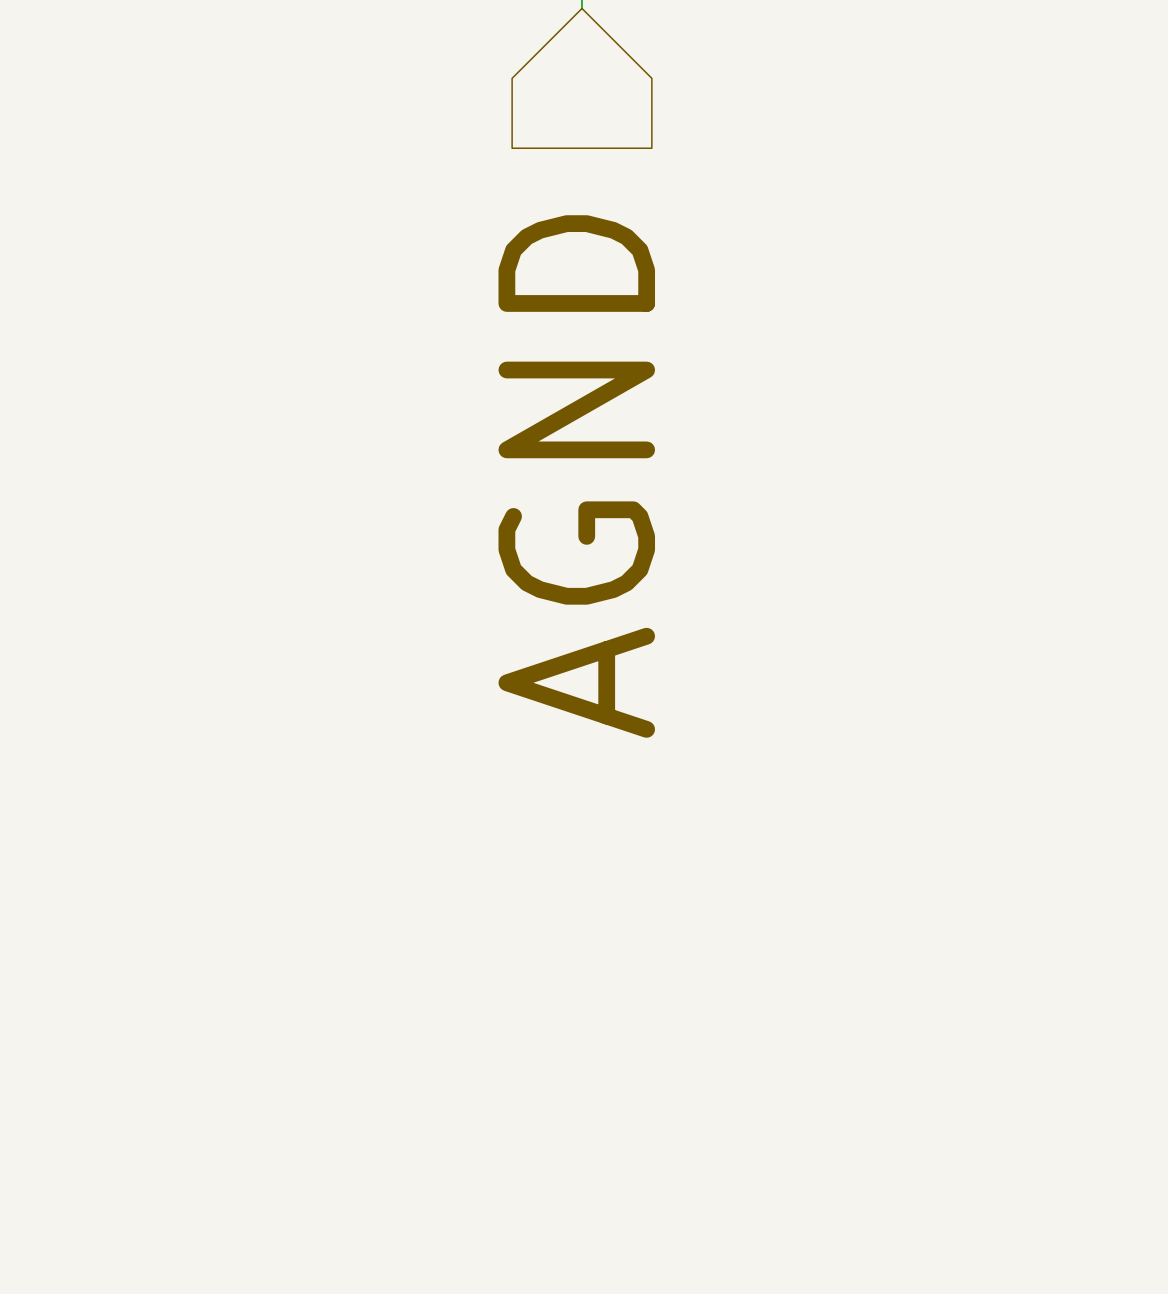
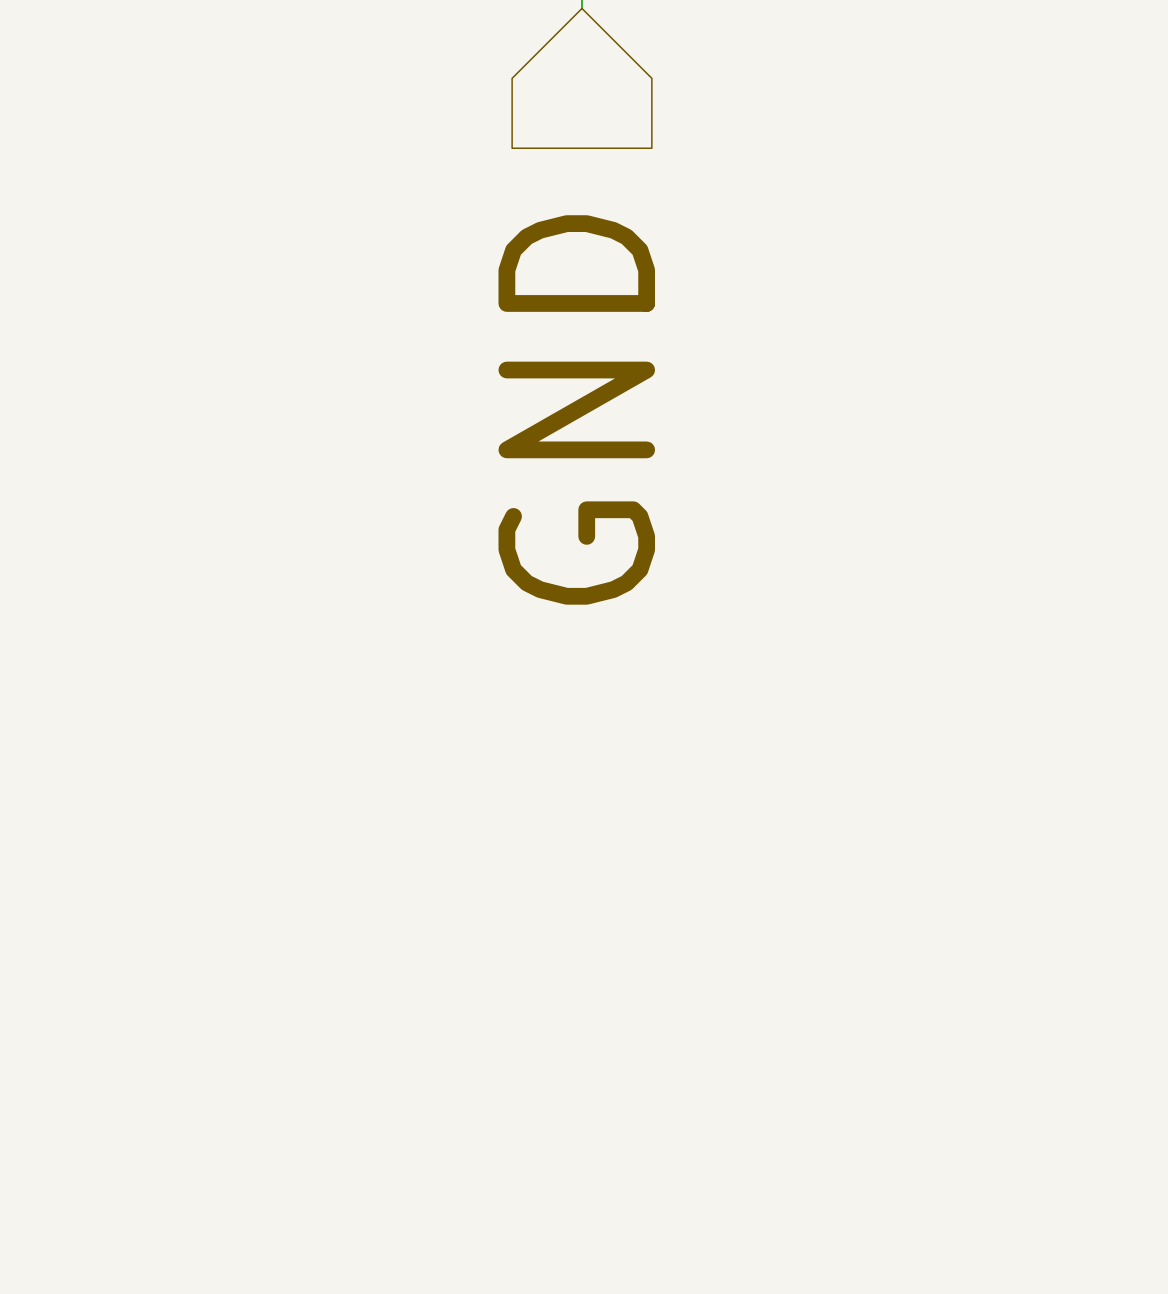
hierarchical label: AGND (576, 476) -> GND (576, 409)

